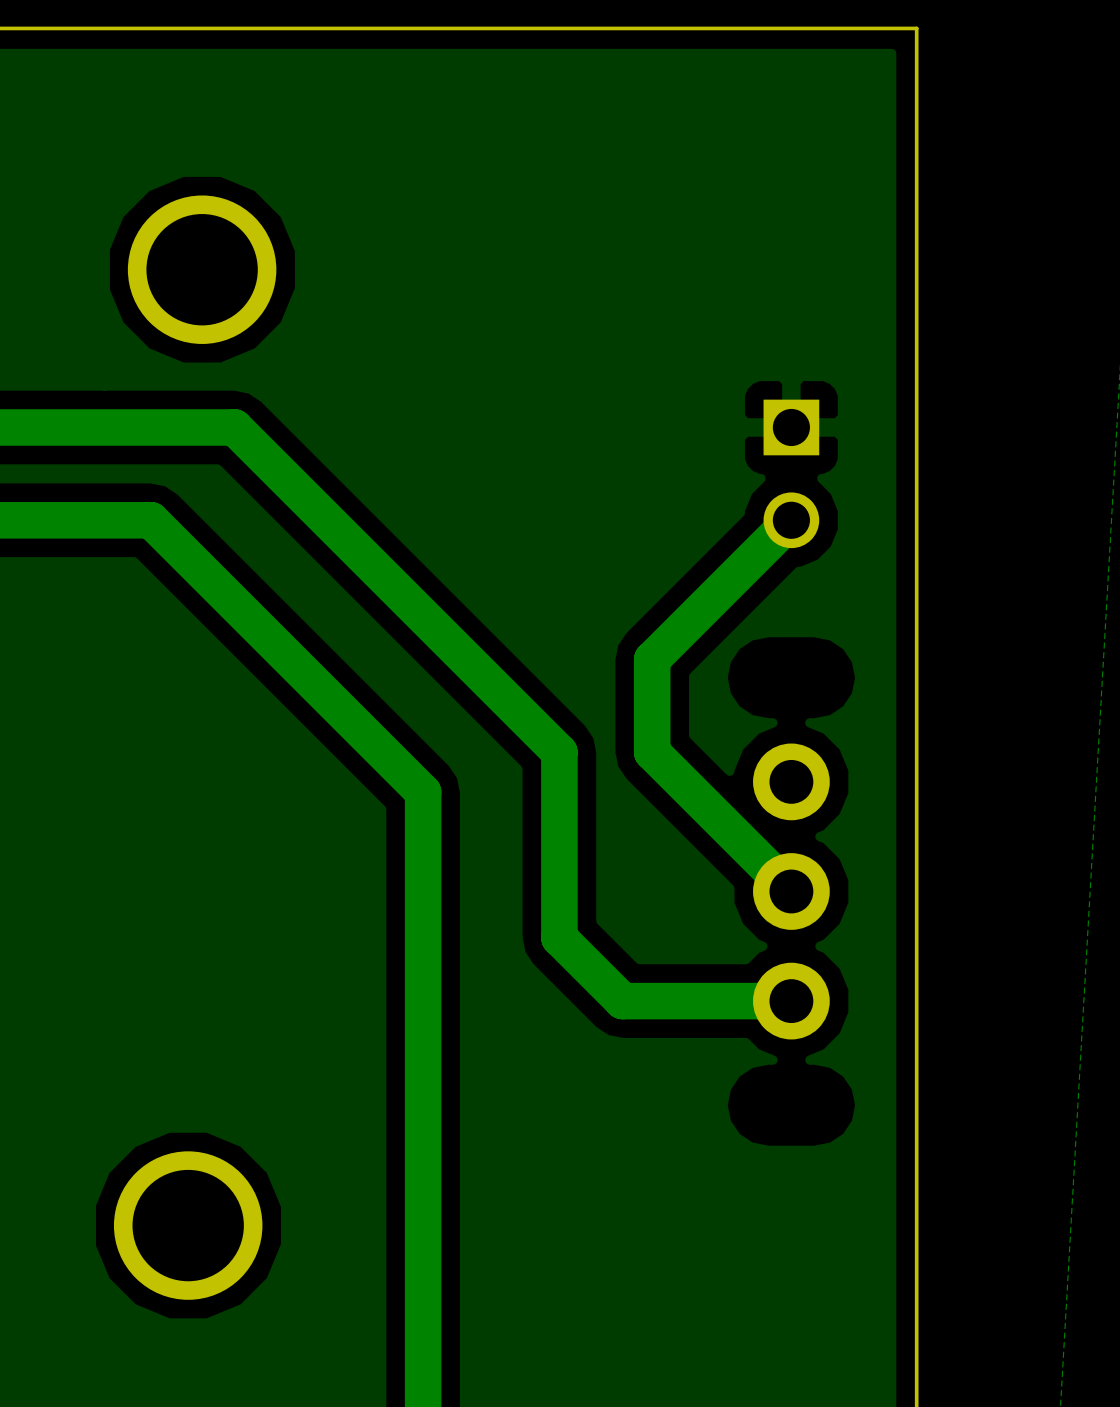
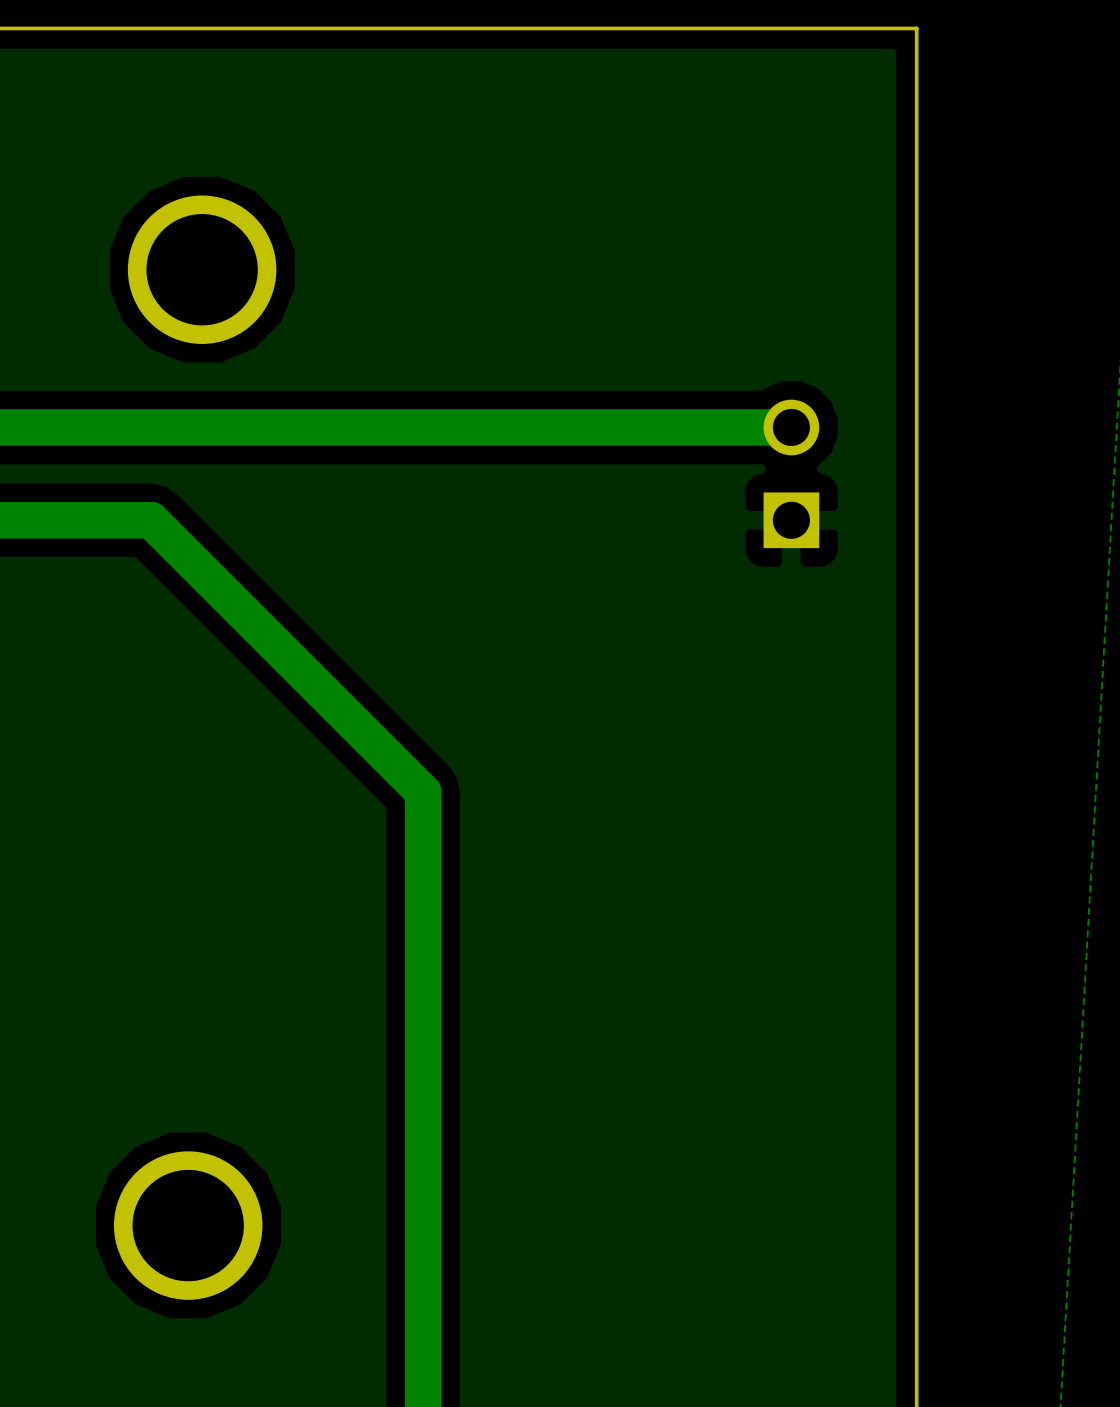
bottom track: (234, 427) (559, 752) (559, 937) (622, 1001) (791, 1001) -> (234, 427) (791, 427)
part rotation: 0° (791, 473) -> 180° (791, 473)
bottom track: (791, 520) (652, 659) (652, 752) (791, 891) -> none
part: (791, 891) -> none

